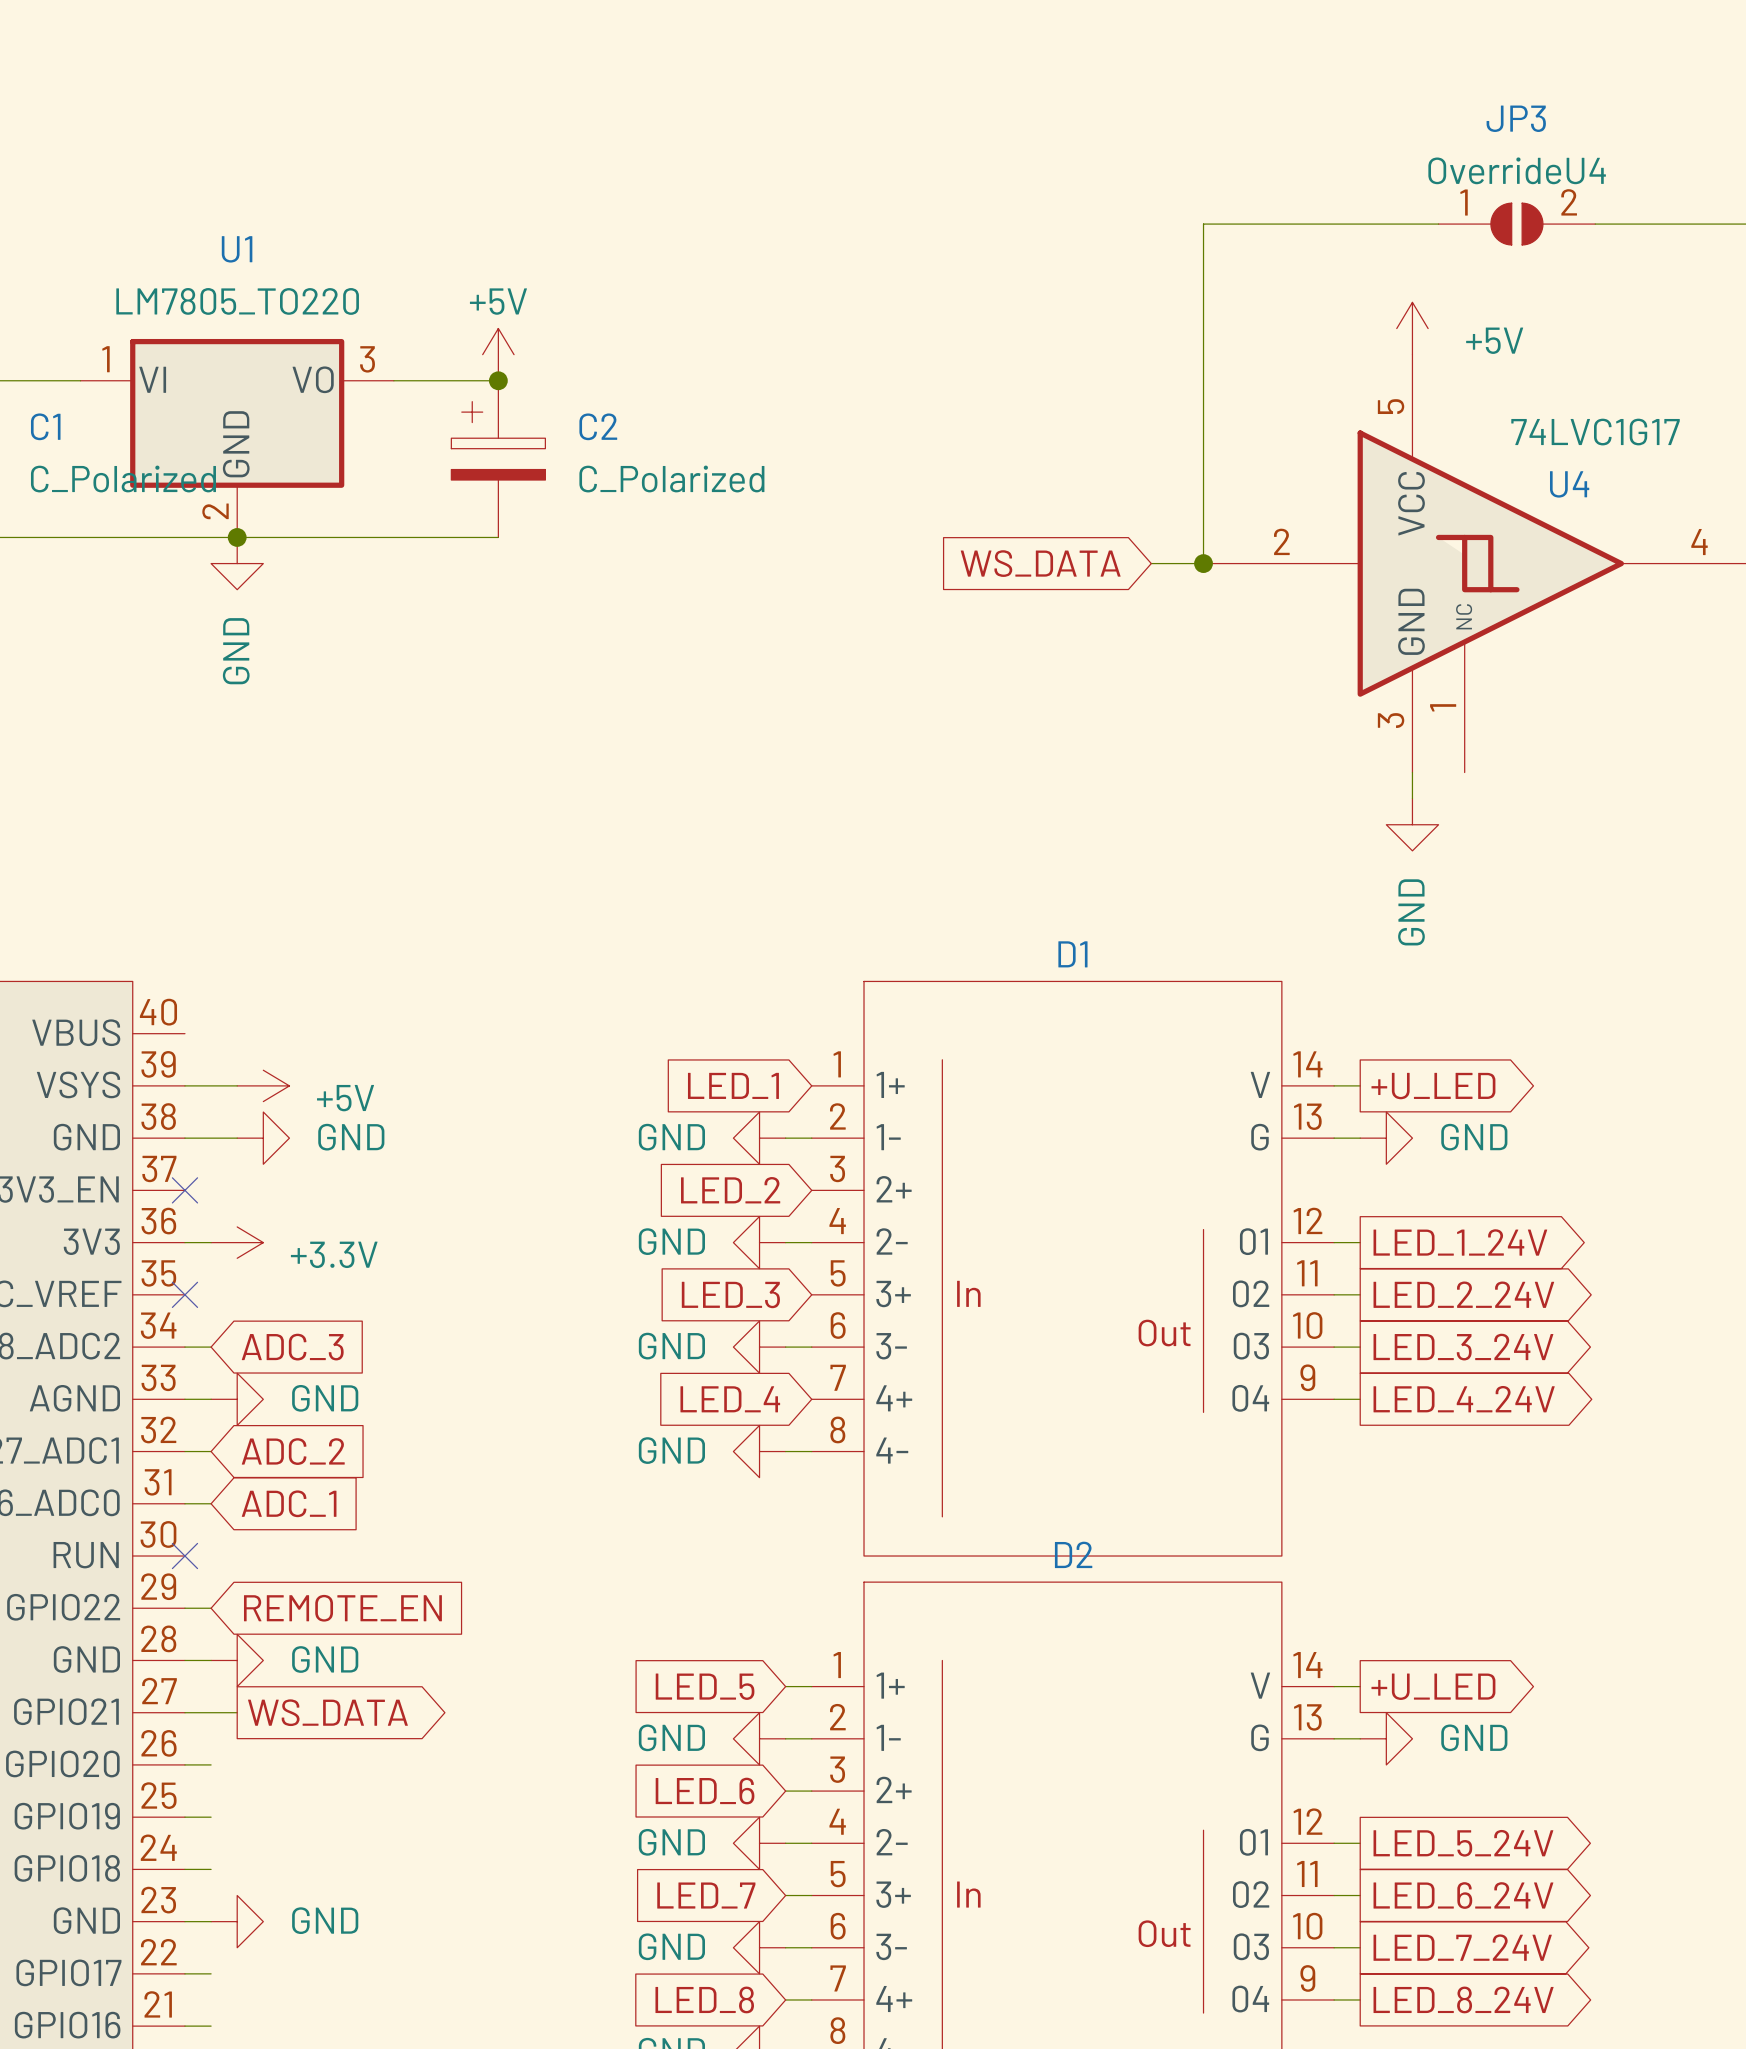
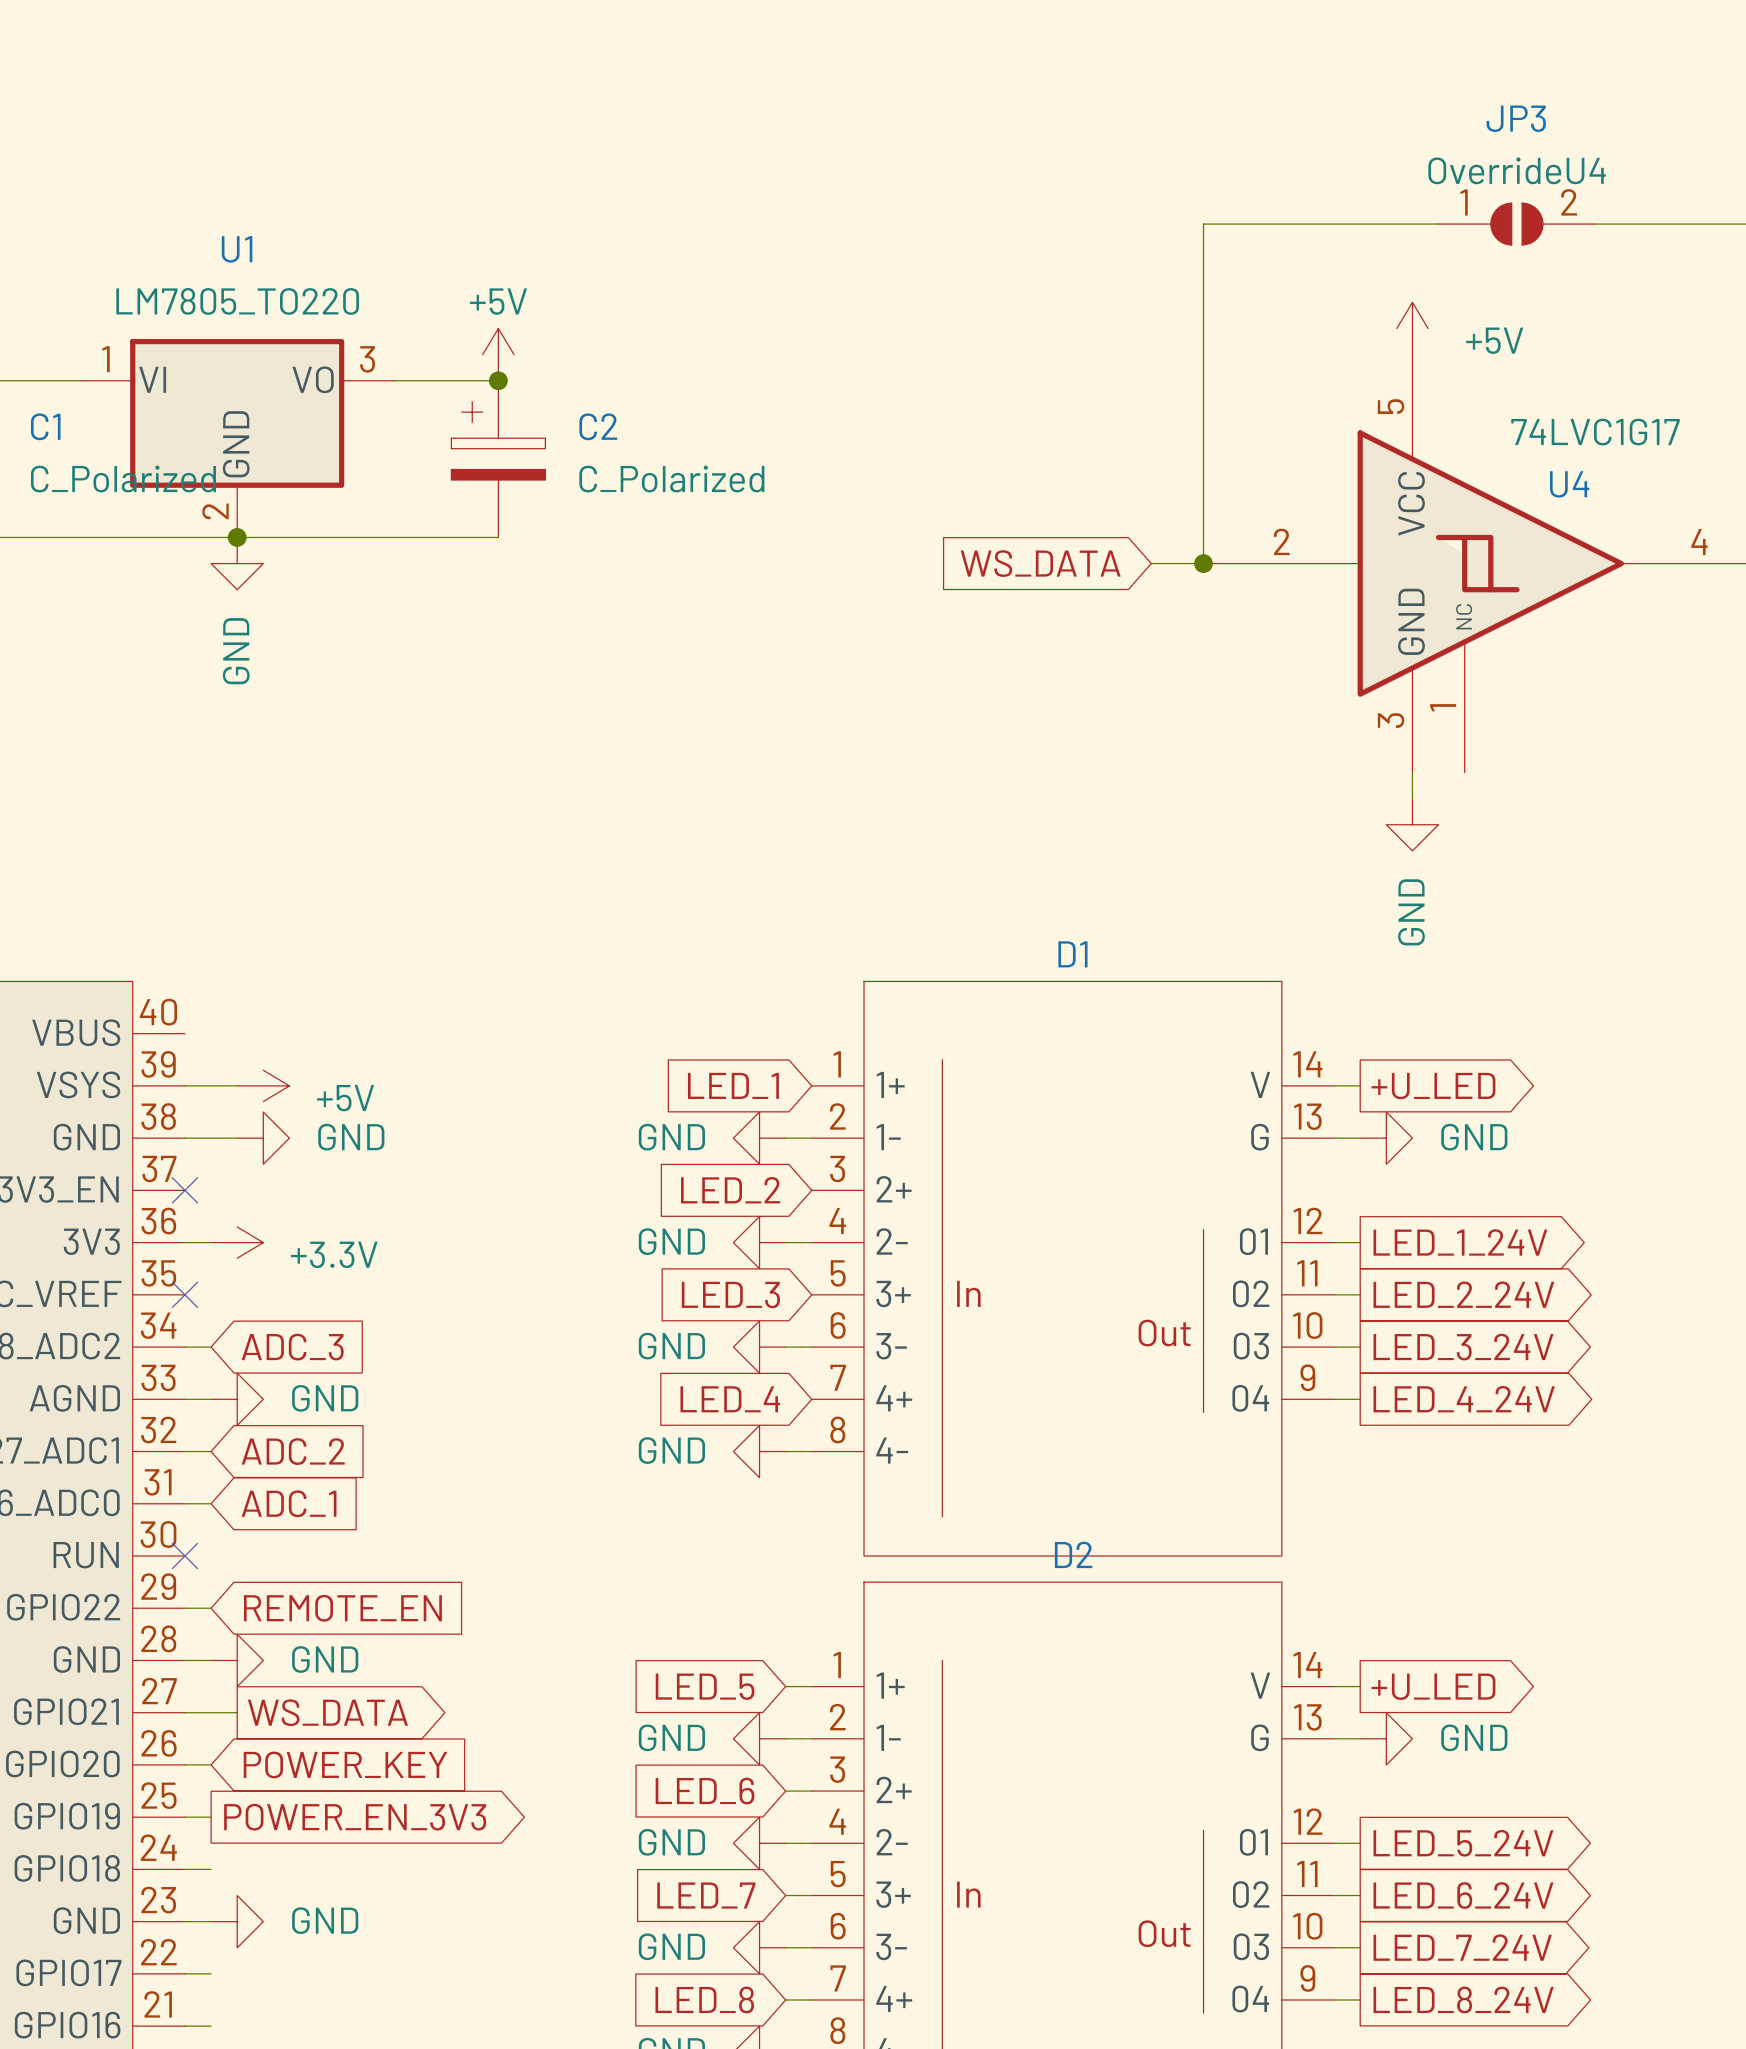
global label: none -> POWER_KEY (345, 1764)
global label: none -> POWER_EN_3V3 (355, 1817)

